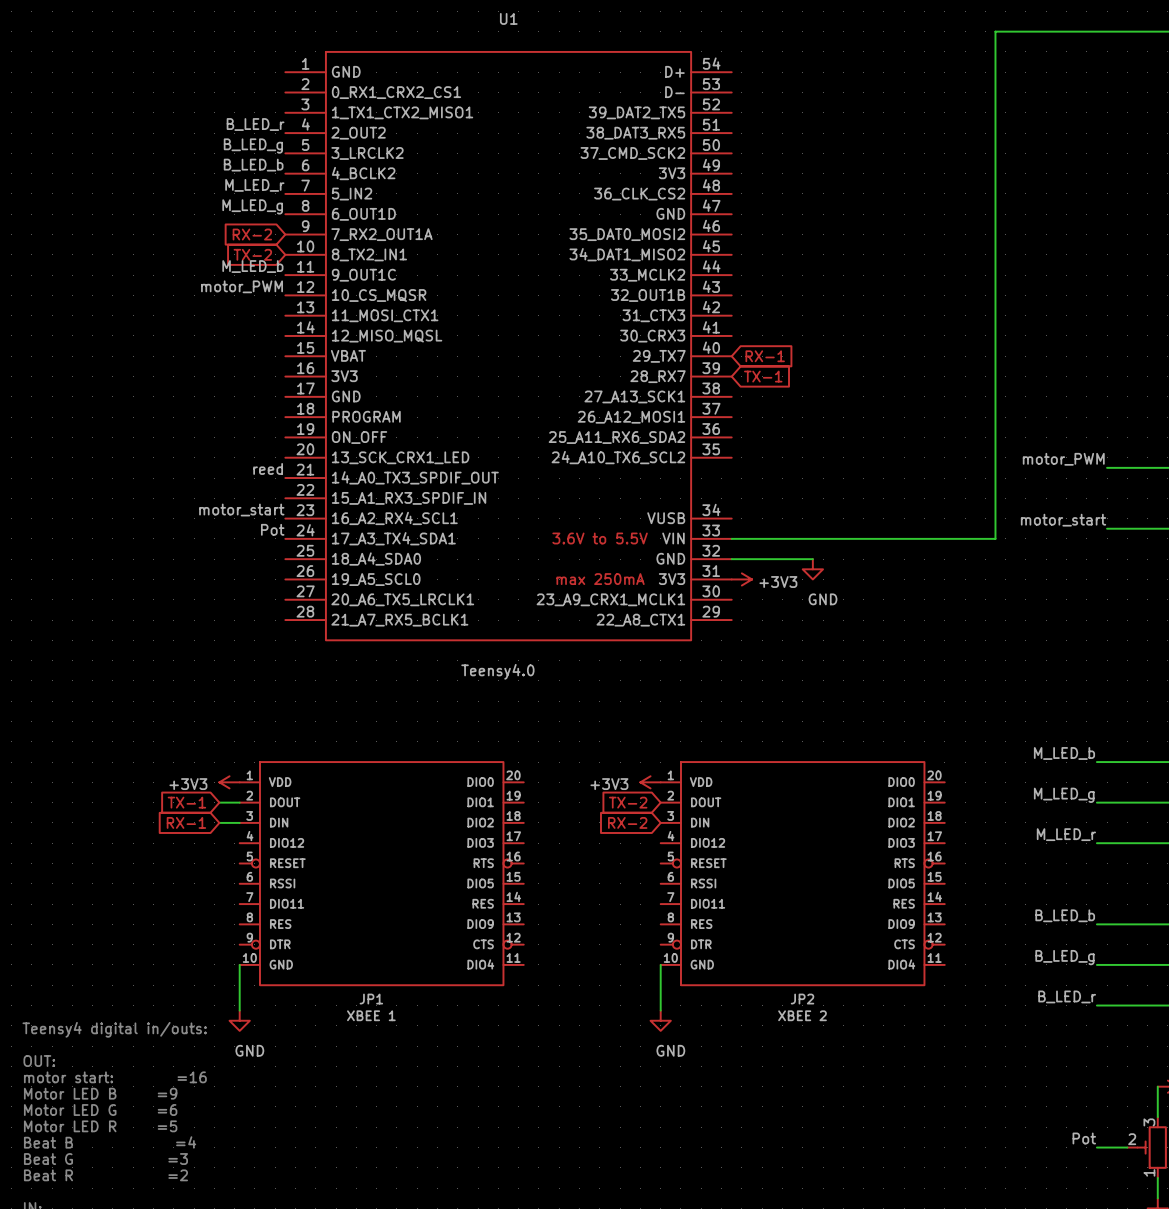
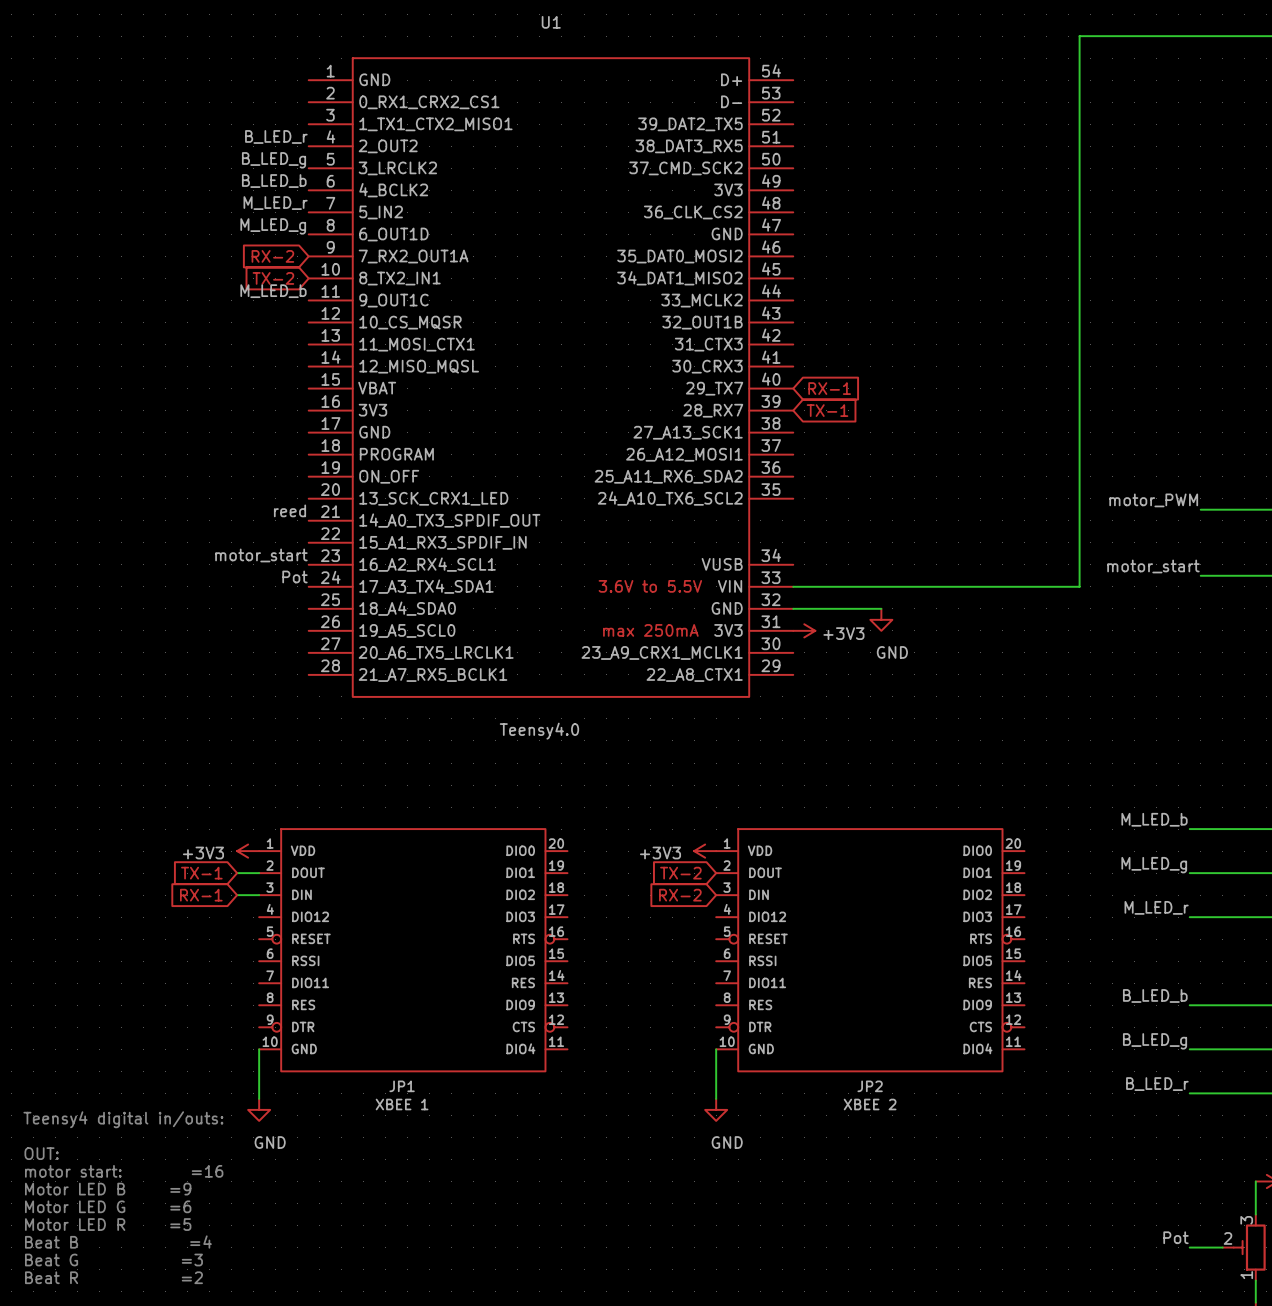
label: motor_PWM (242, 286) -> none

